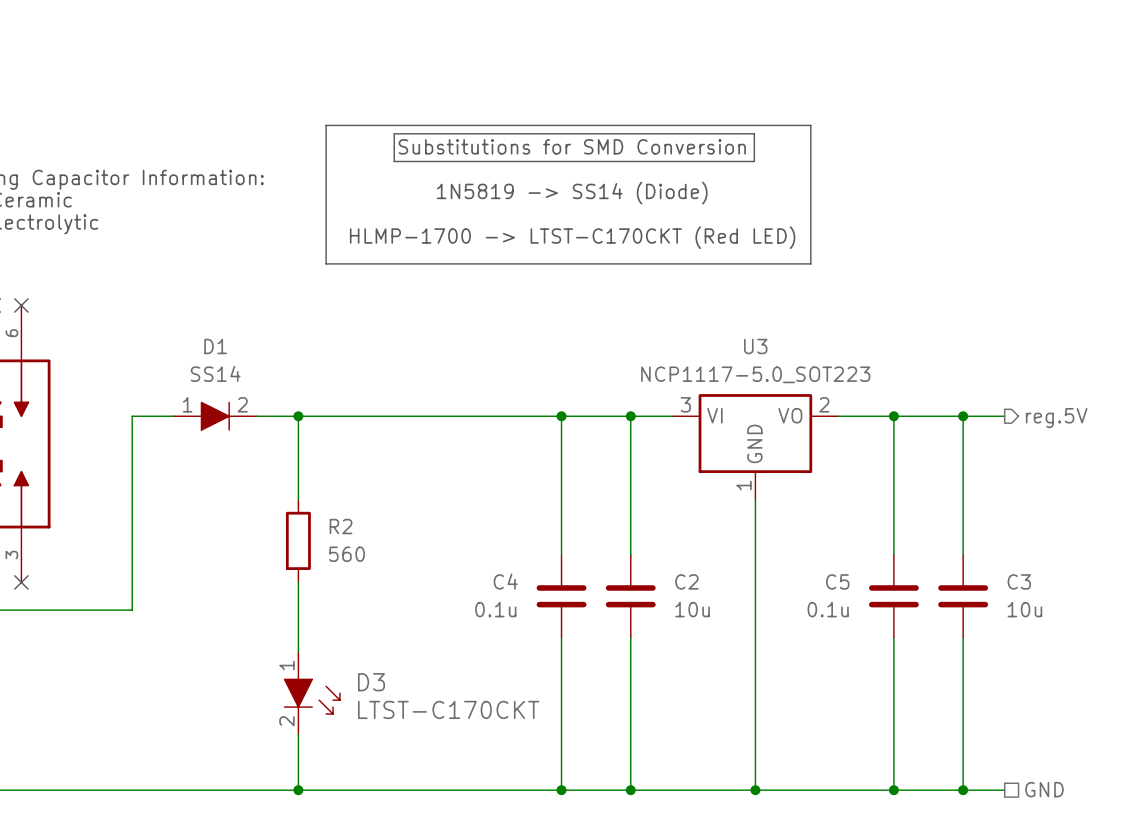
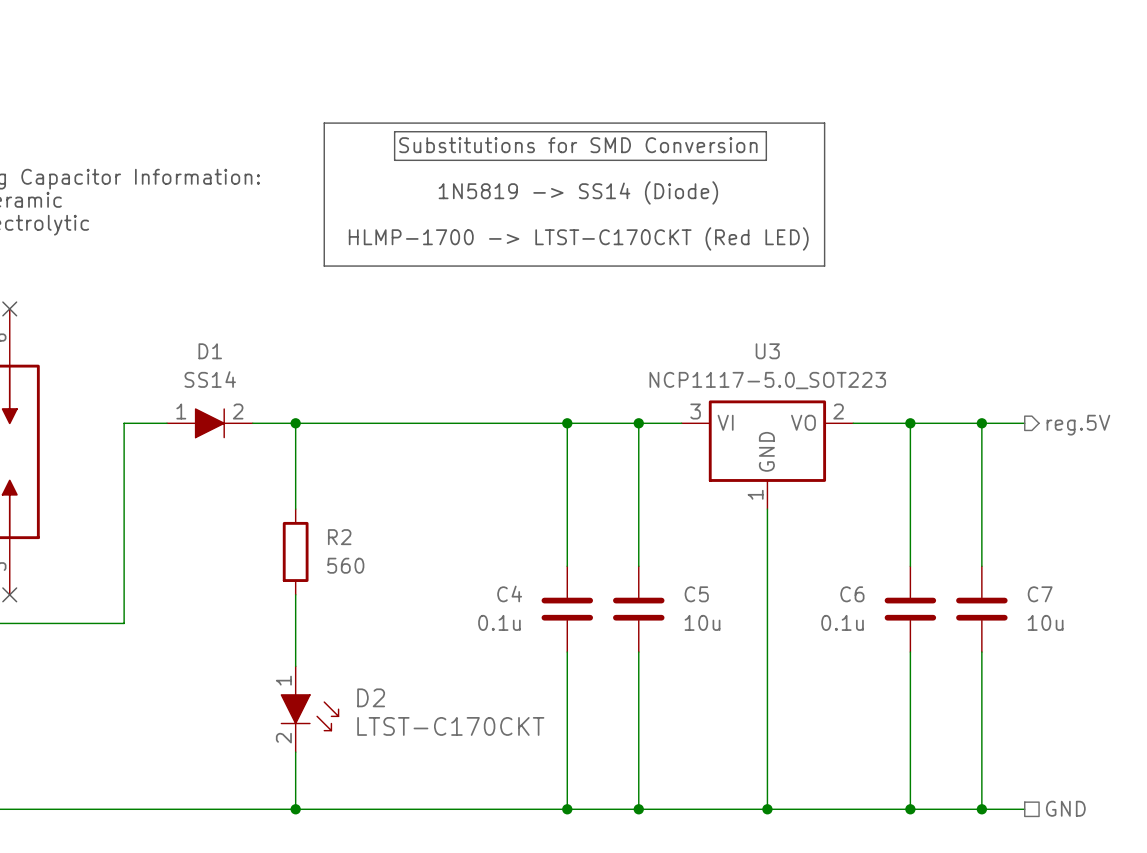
C2 name: C2 (686, 581) -> C5 (696, 594)
C5 name: C5 (837, 581) -> C6 (852, 594)
C3 name: C3 (1019, 581) -> C7 (1040, 594)
D3 name: D3 (371, 682) -> D2 (371, 697)

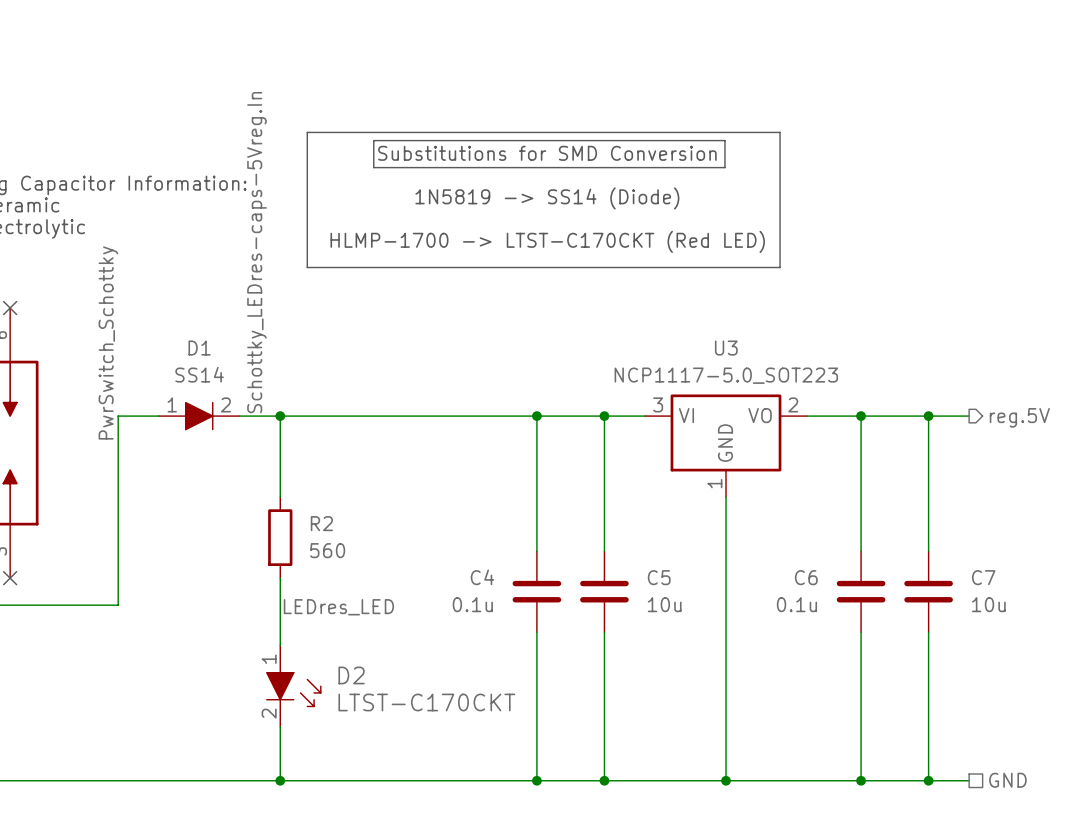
label: none -> Schottky_LEDres-caps-5Vreg.In (256, 252)
label: none -> PwrSwitch_Schottky (108, 342)
label: none -> LEDres_LED (338, 607)

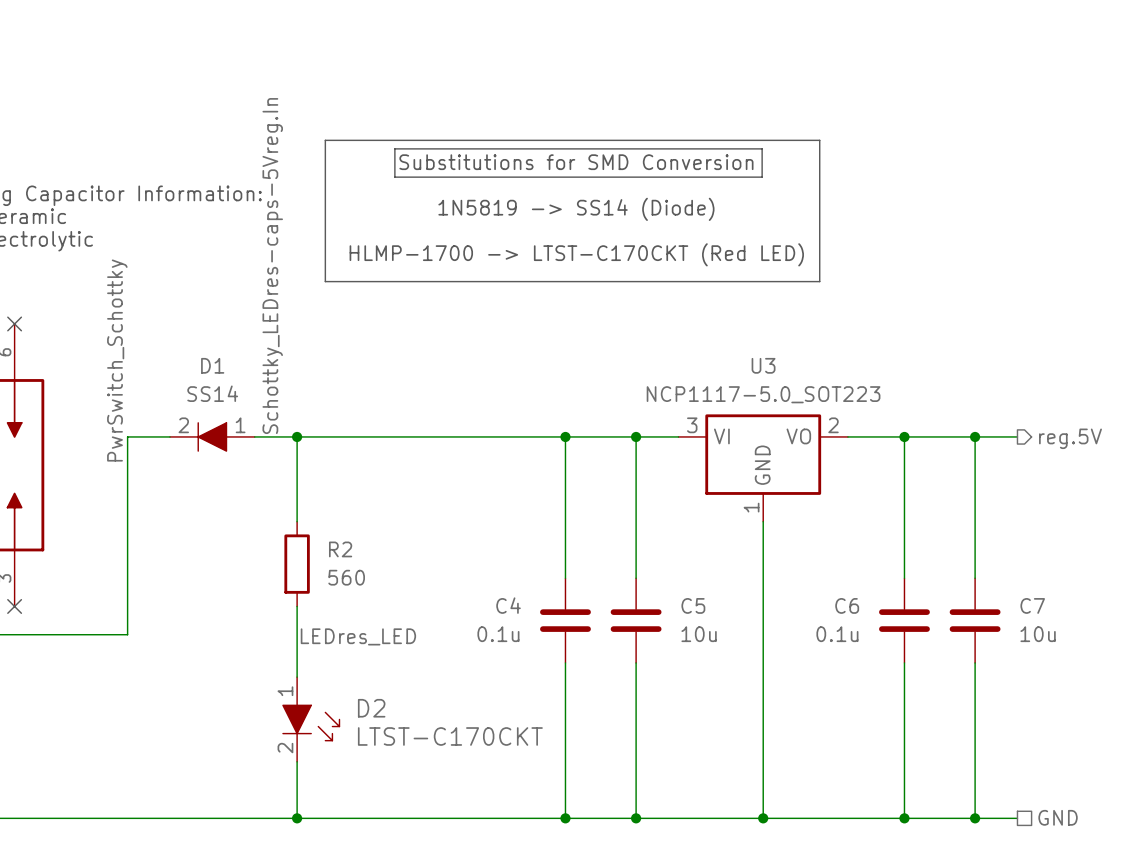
D1 rotation: 0° (199, 416) -> 180° (212, 436)

